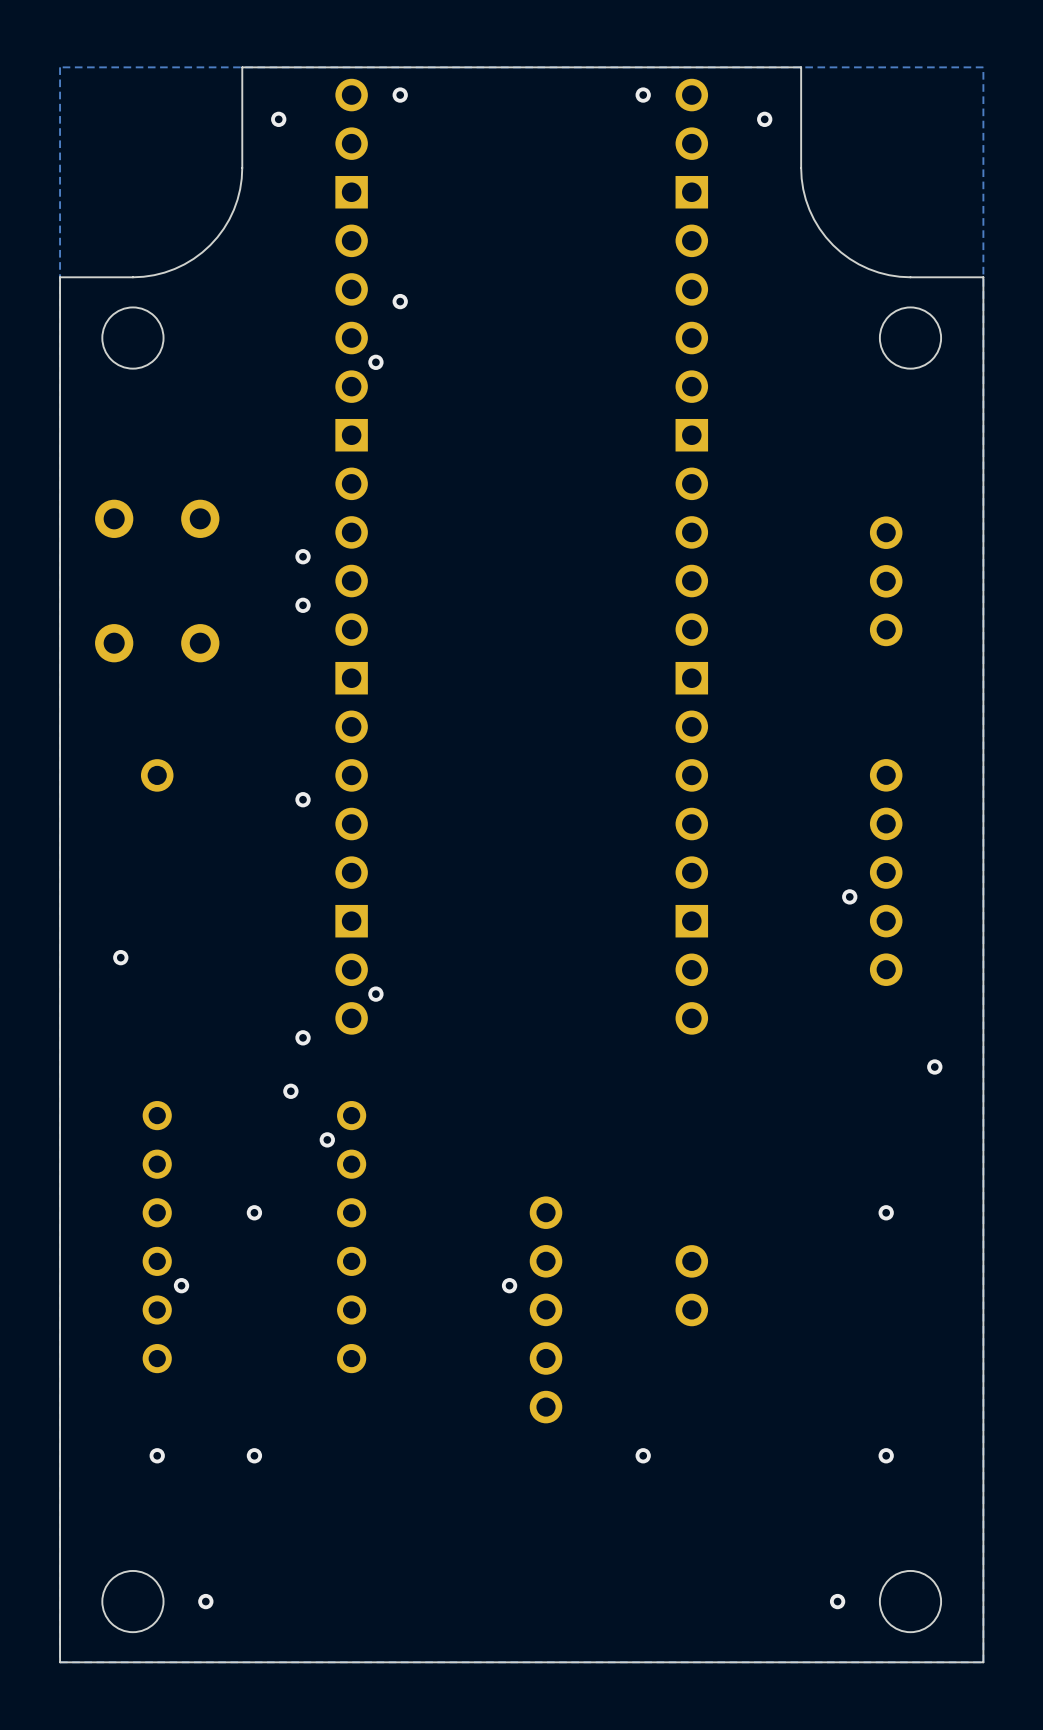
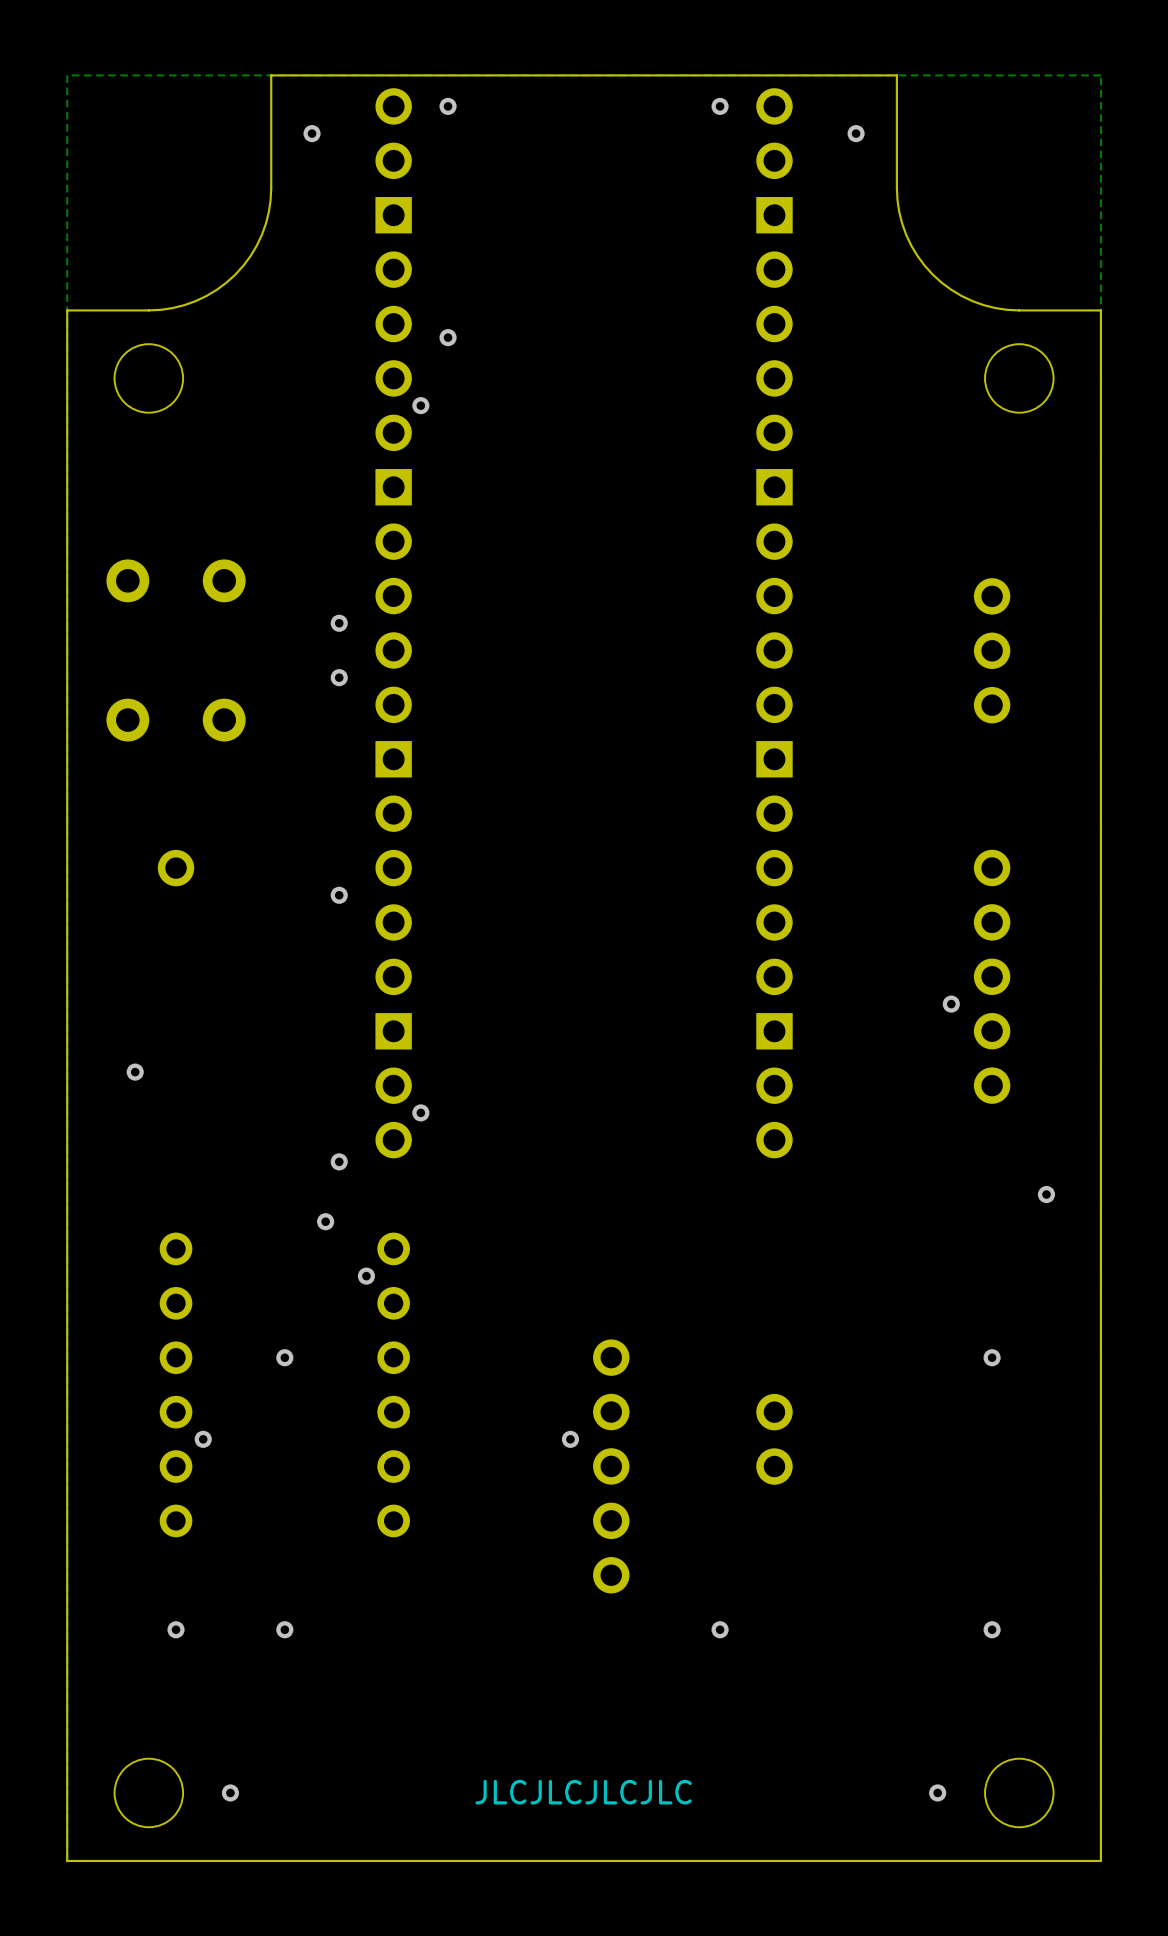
text: none -> JLCJLCJLCJLC (583, 1792)

